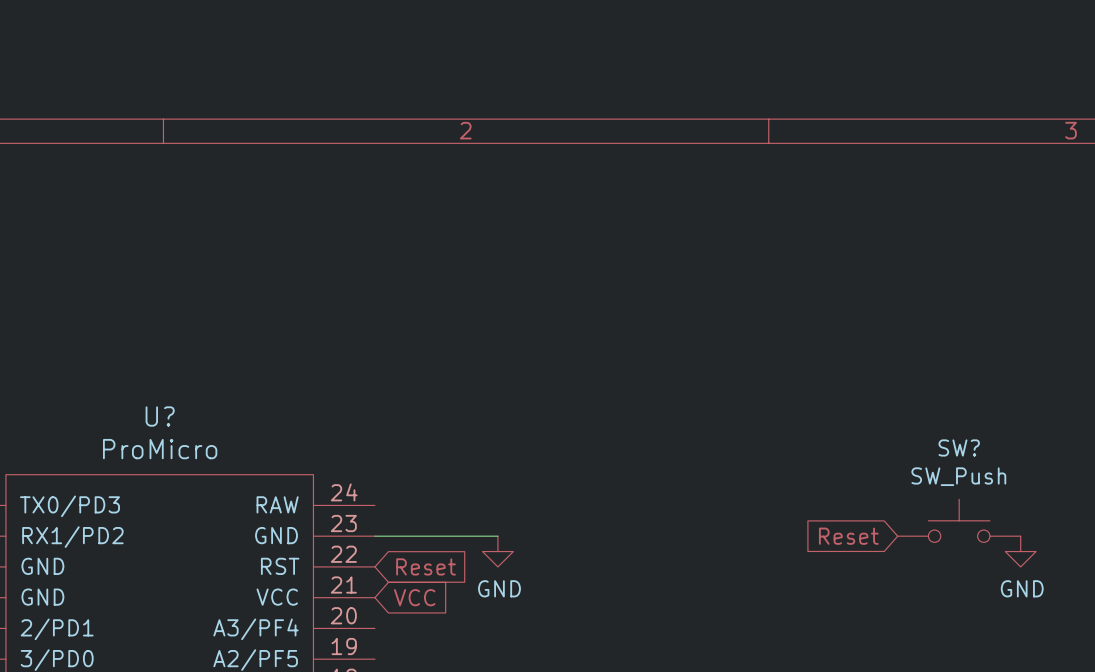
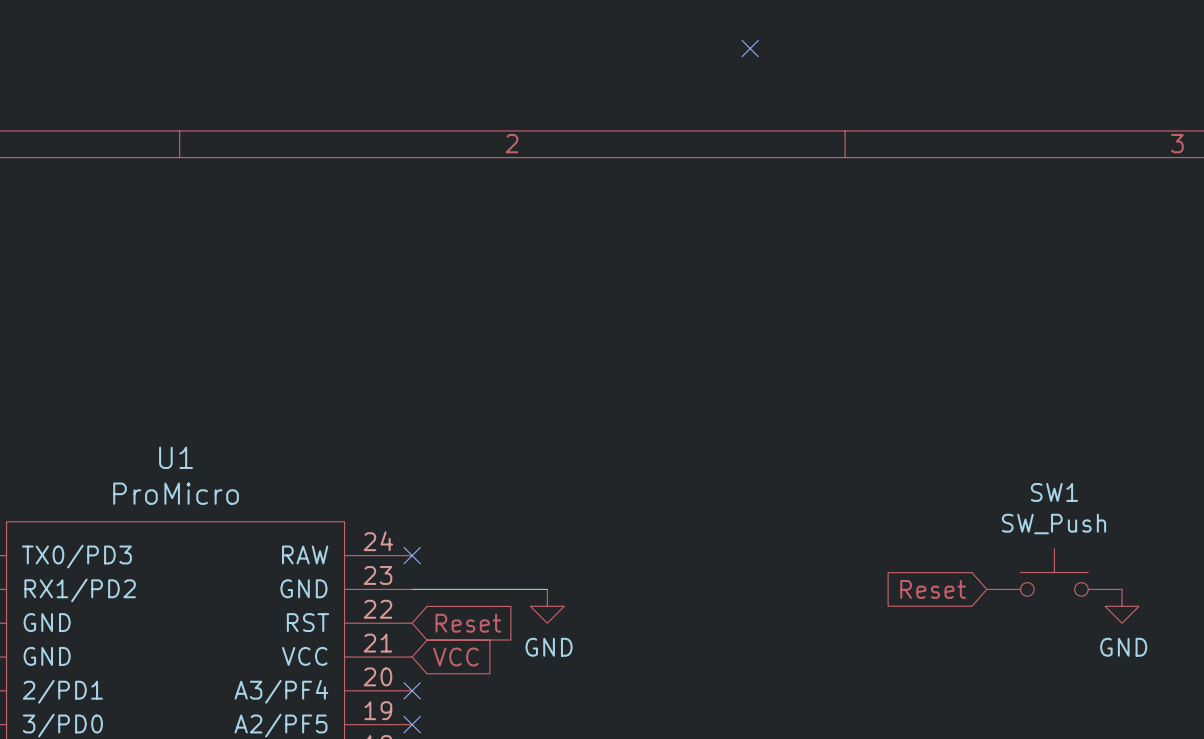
no-connect mark: none -> (750, 48)
U? name: U? (160, 416) -> U1 (176, 457)
SW? name: SW? (959, 447) -> SW1 (1054, 492)
no-connect mark: none -> (412, 555)
no-connect mark: none -> (412, 690)
no-connect mark: none -> (412, 724)

